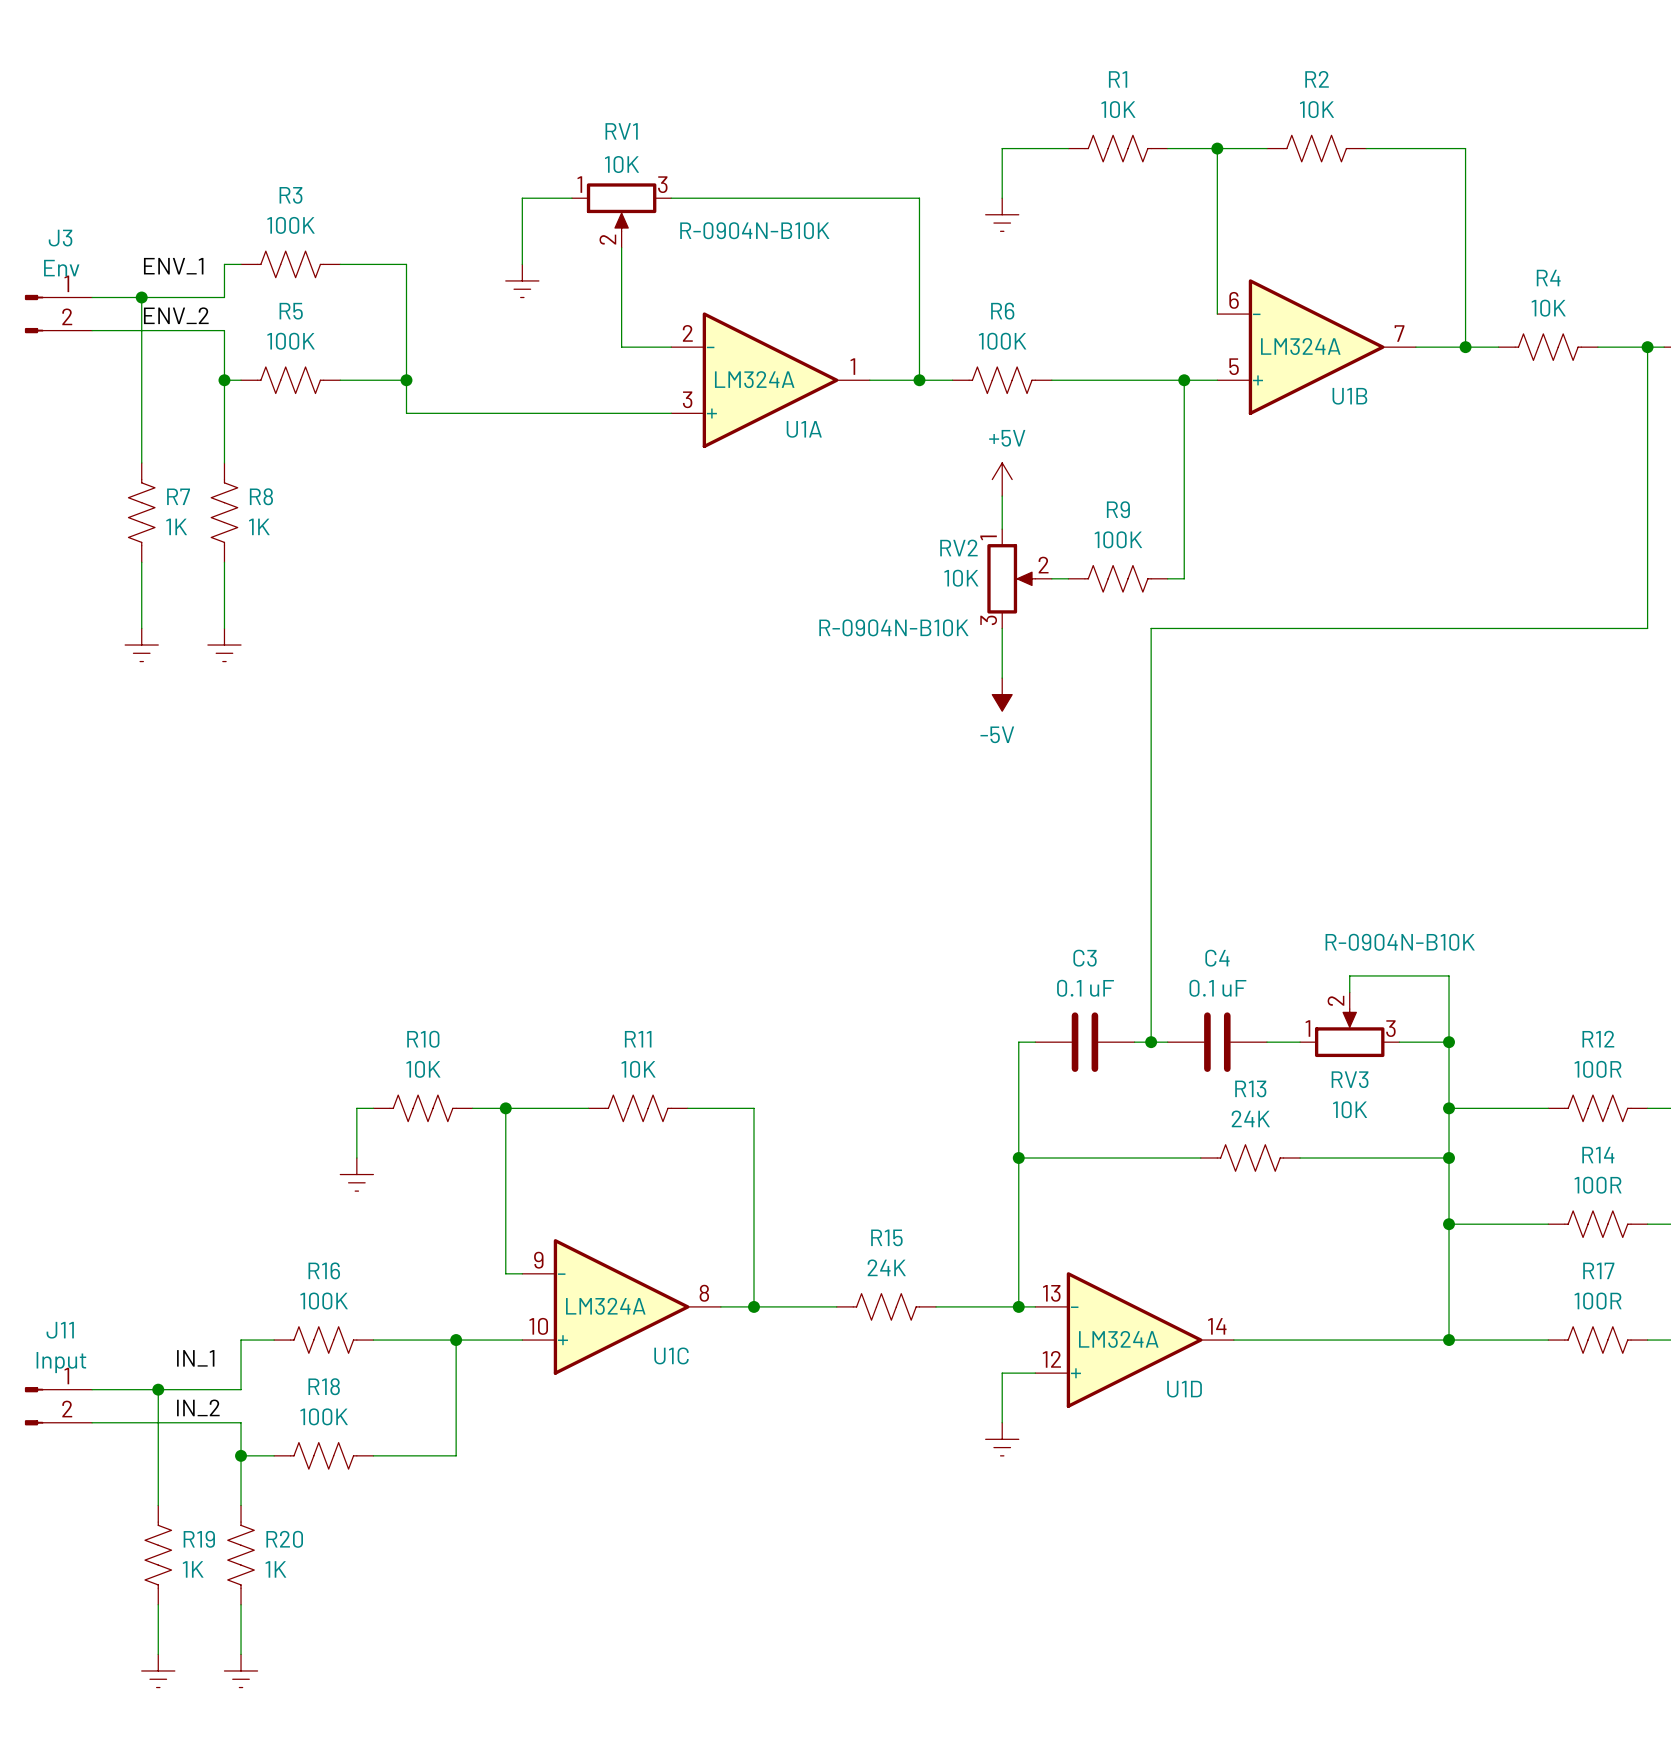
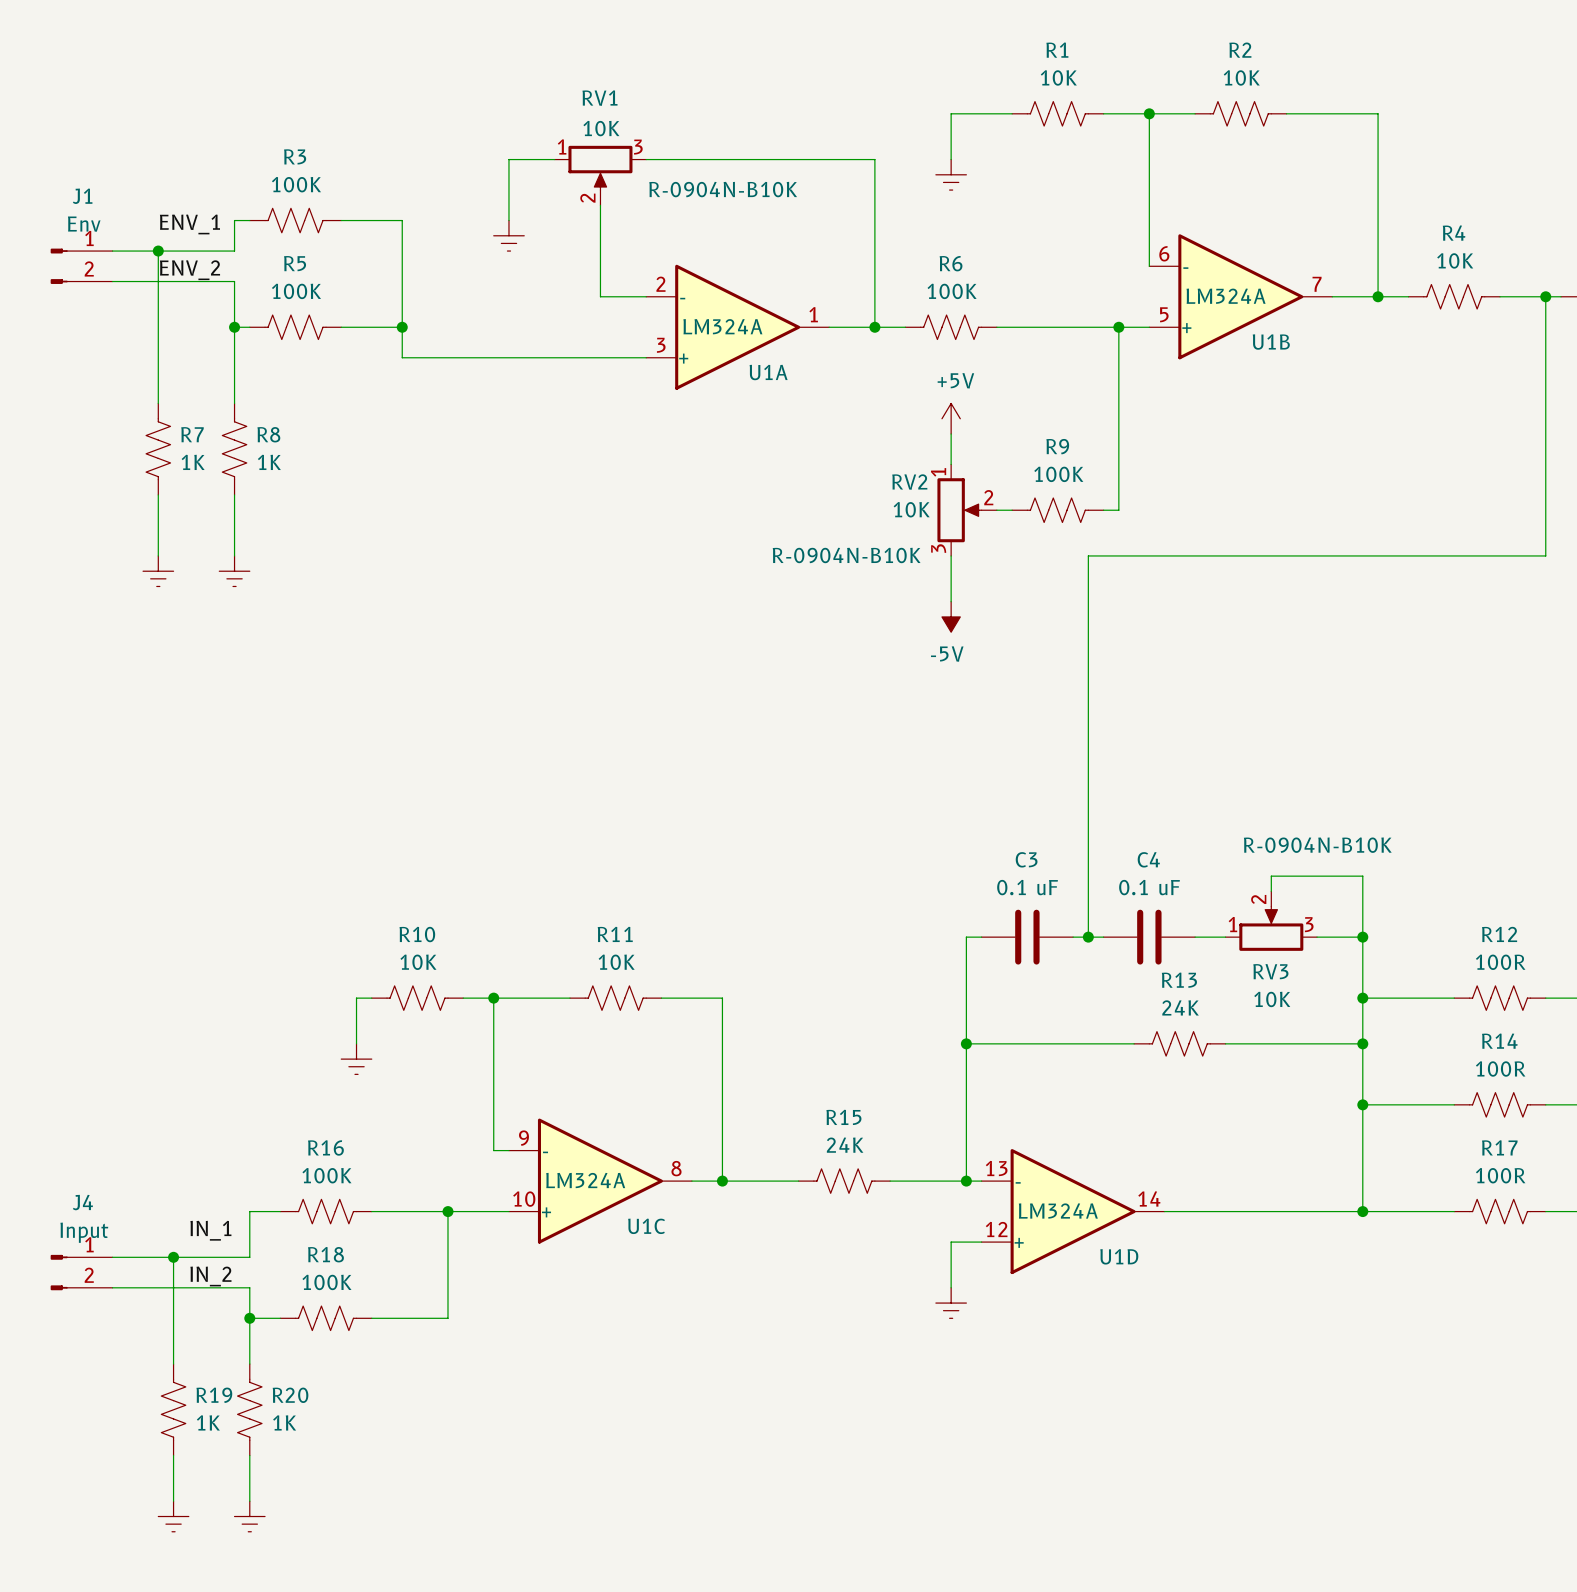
J3 name: J3 (60, 238) -> J1 (82, 196)
J11 name: J11 (60, 1330) -> J4 (82, 1202)

